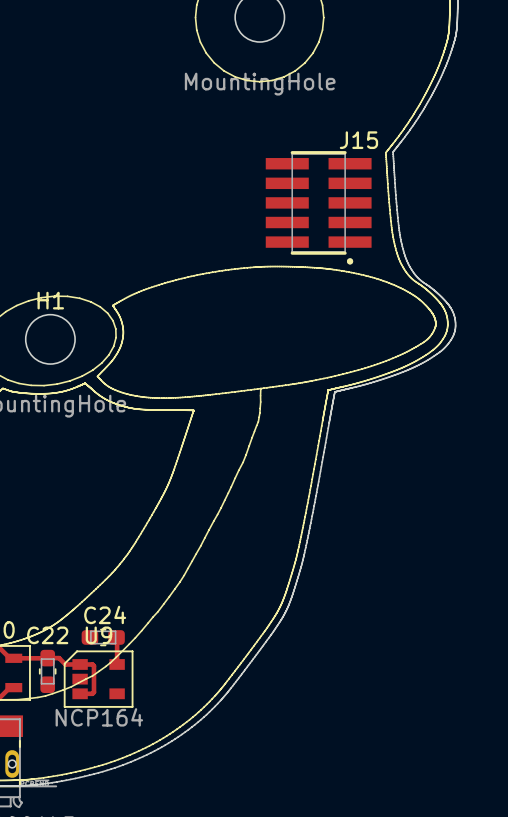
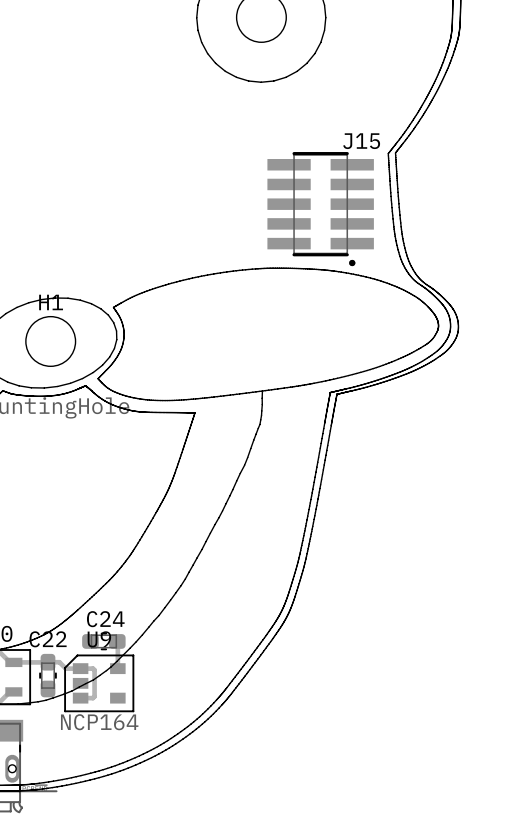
part value: MountingHole (260, 84) -> none

